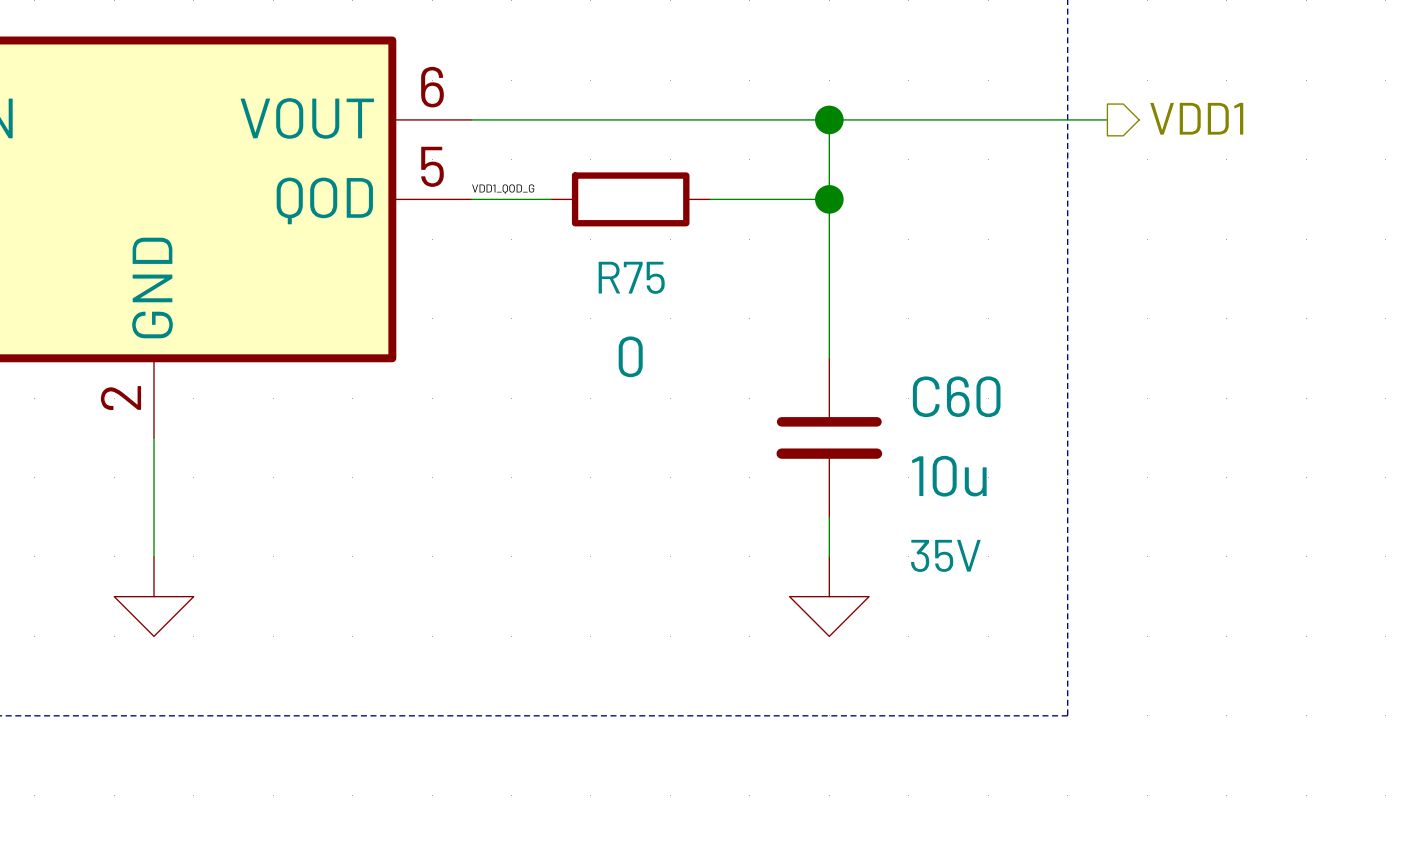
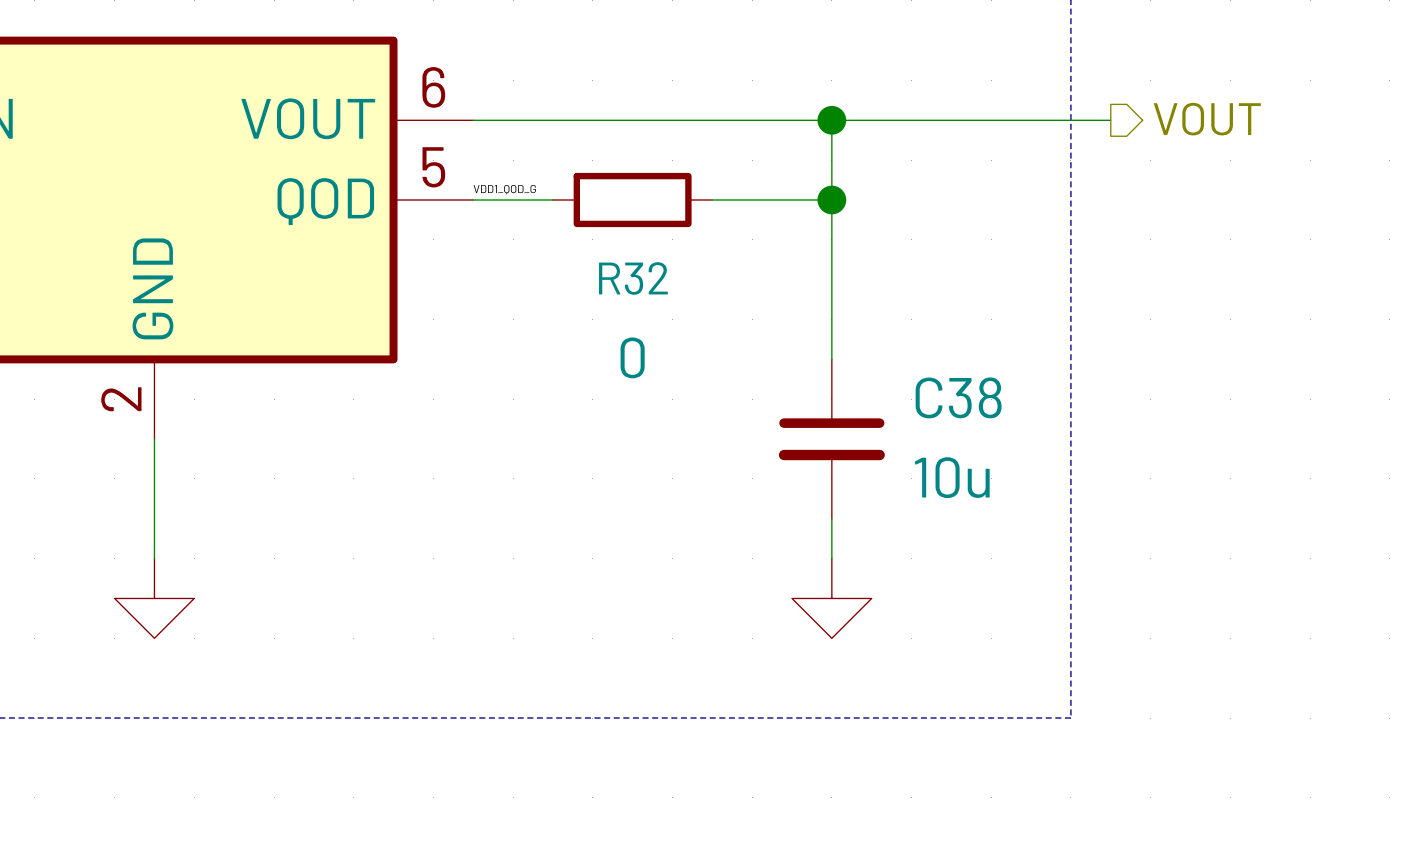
hierarchical label: VDD1 (1196, 118) -> VOUT (1207, 119)
R75 name: R75 (631, 277) -> R32 (633, 278)
C60 name: C60 (956, 396) -> C38 (958, 397)
C60 text: 35V (945, 555) -> none

